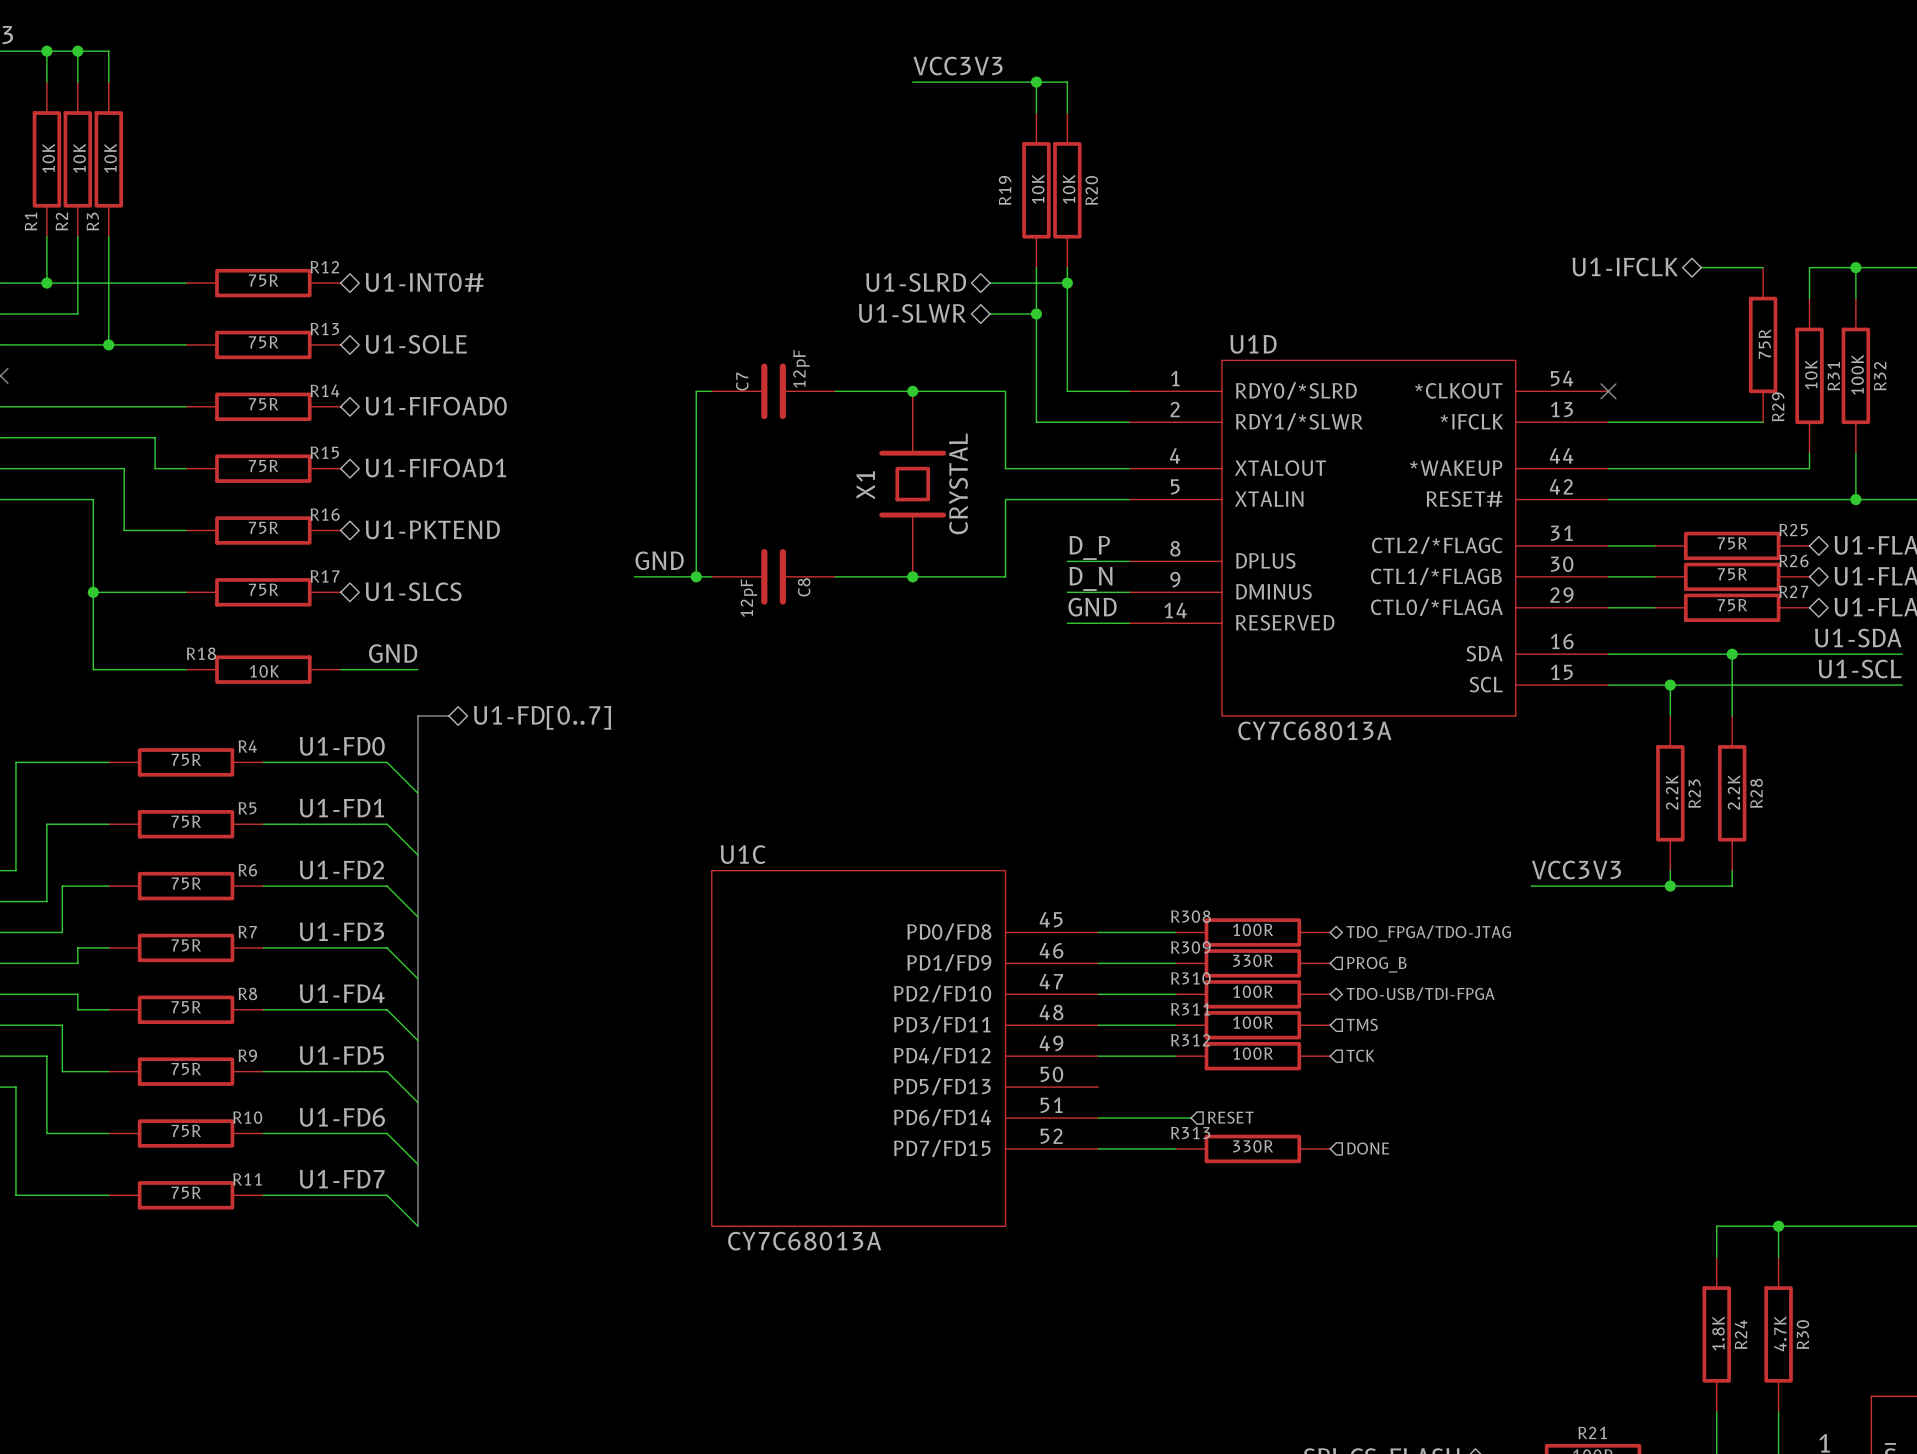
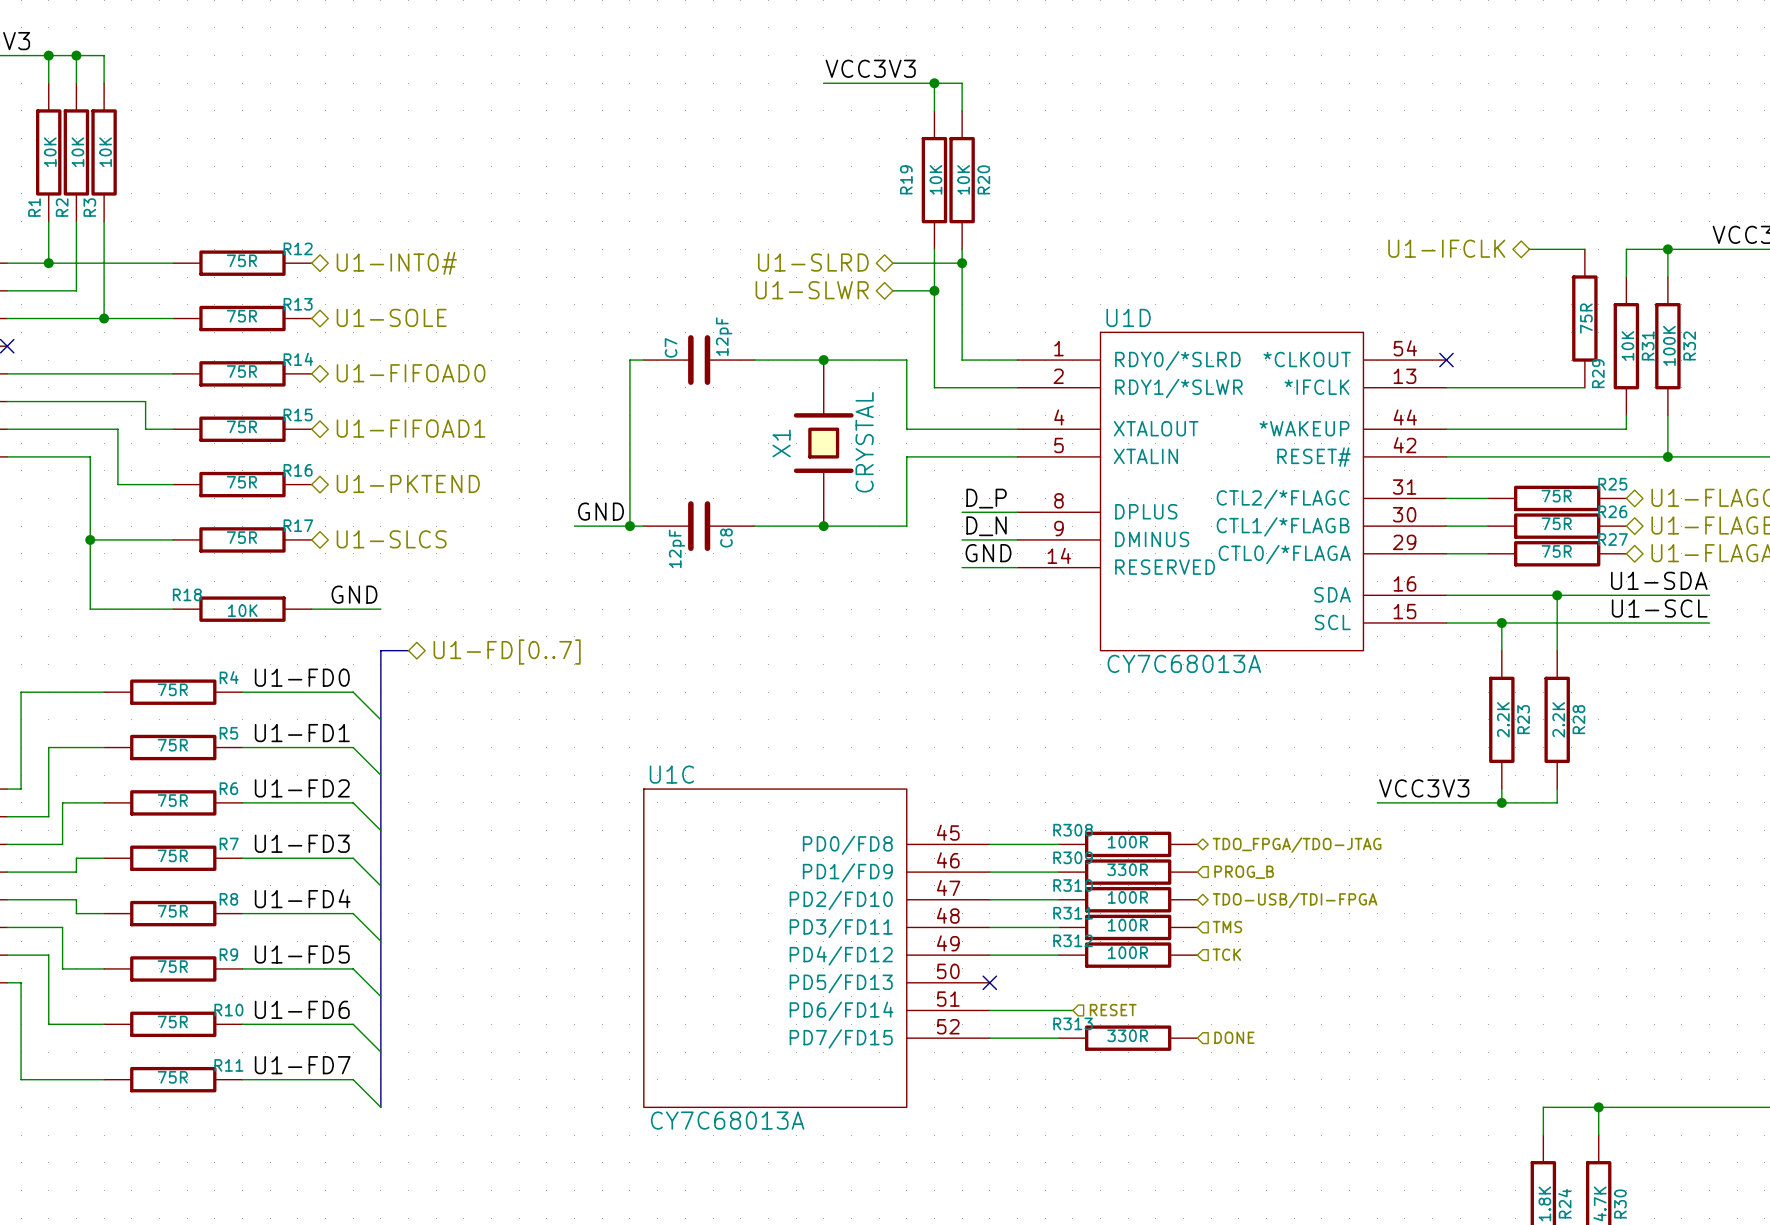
no-connect mark: none -> (989, 982)

